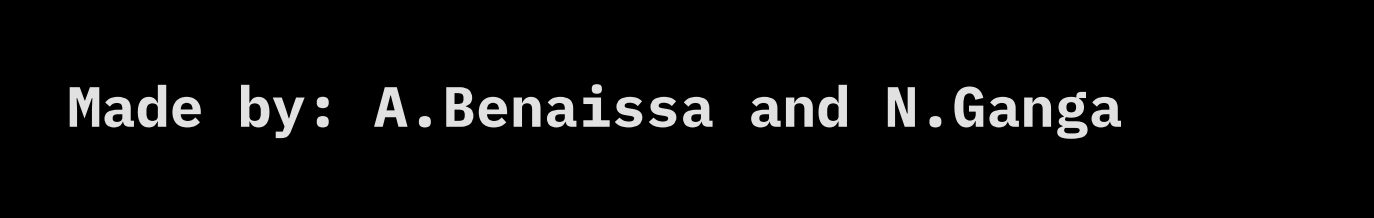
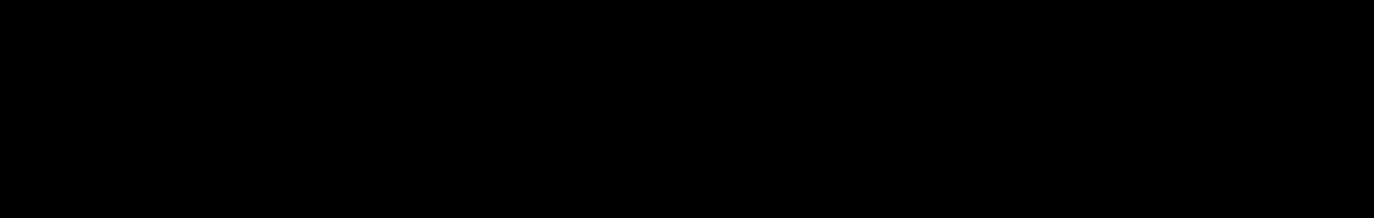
text: Made by: A.Benaissa and N.Ganga (595, 111) -> none

